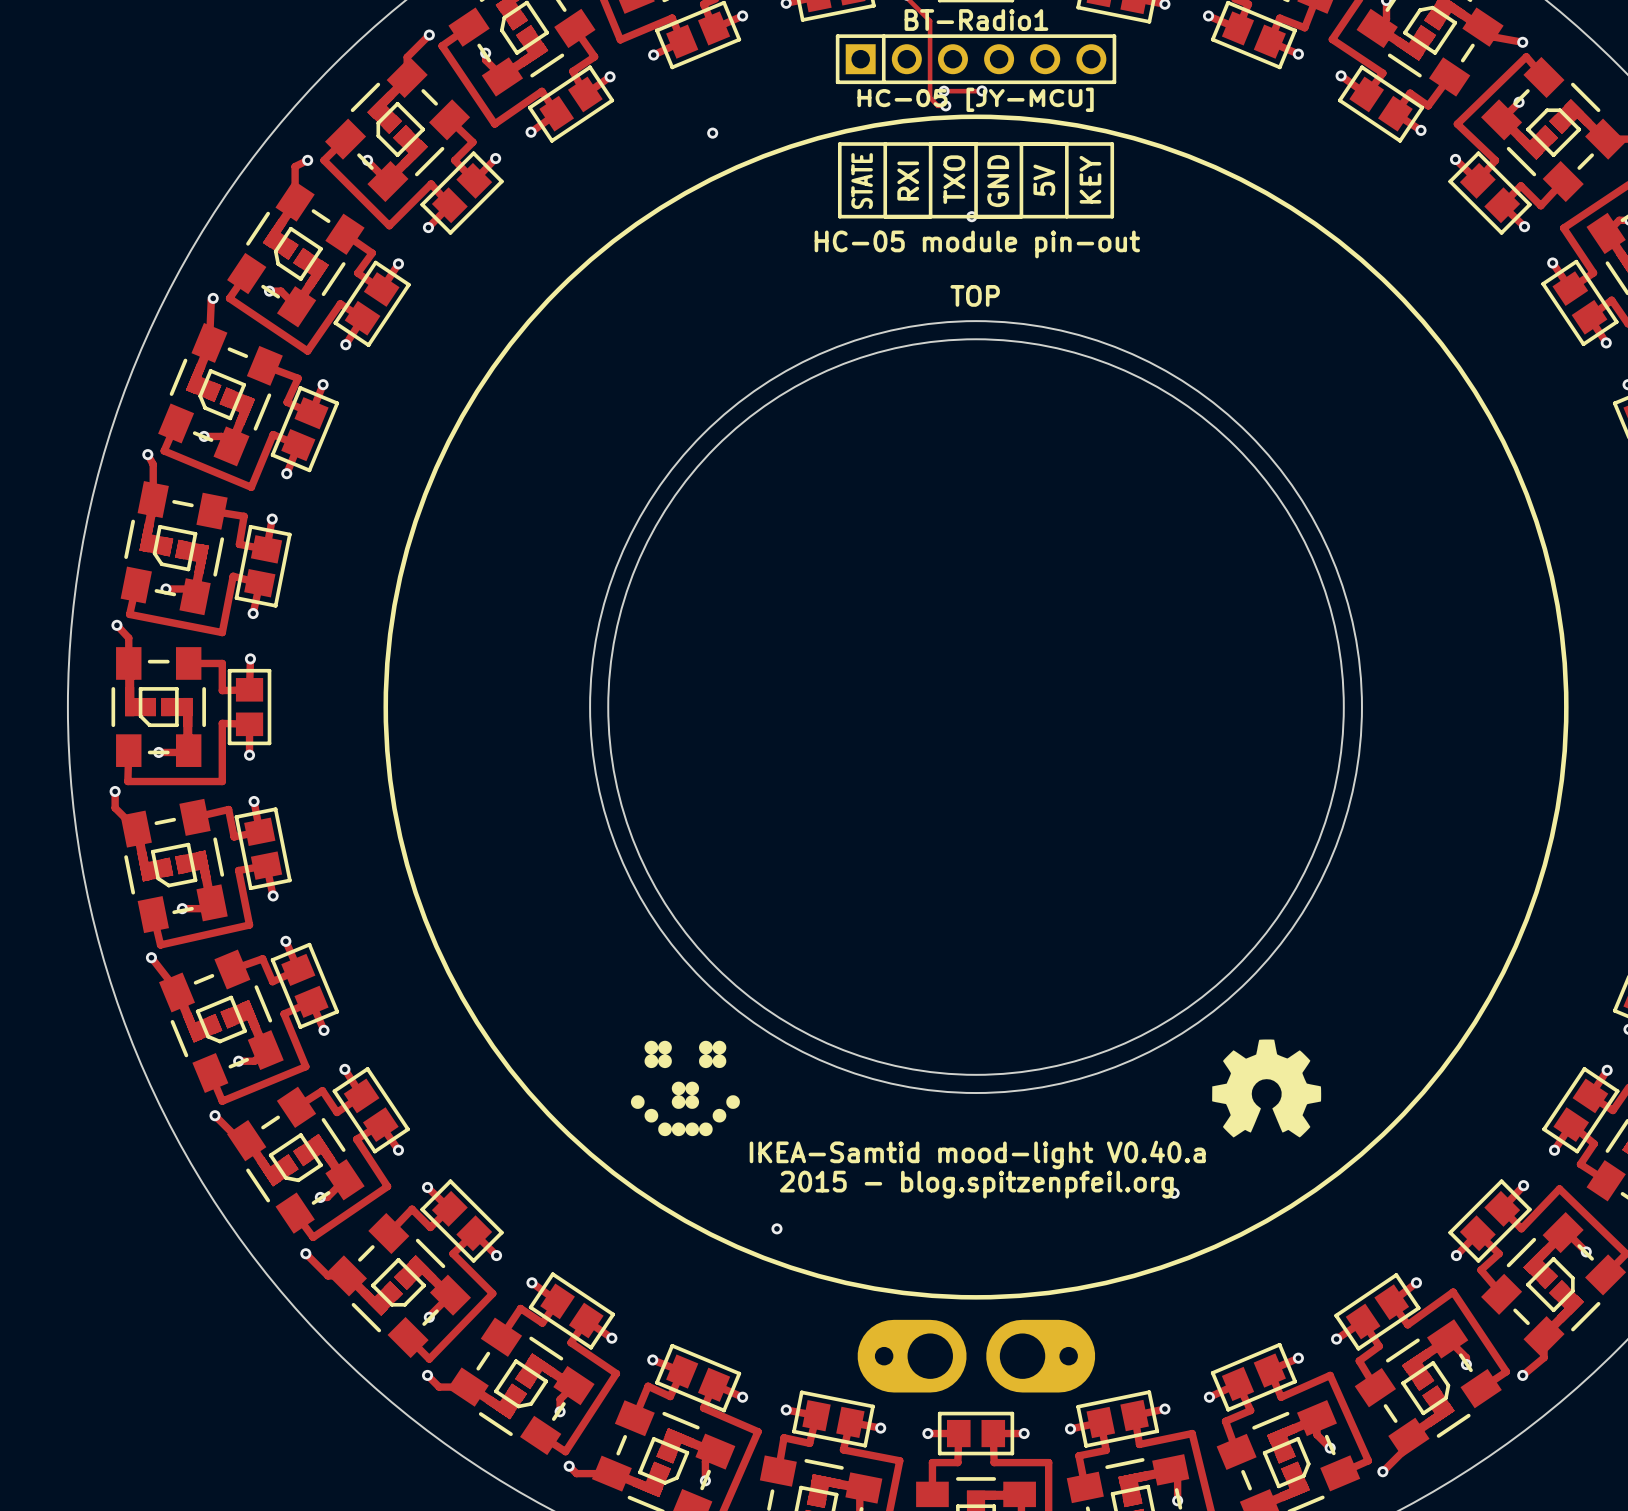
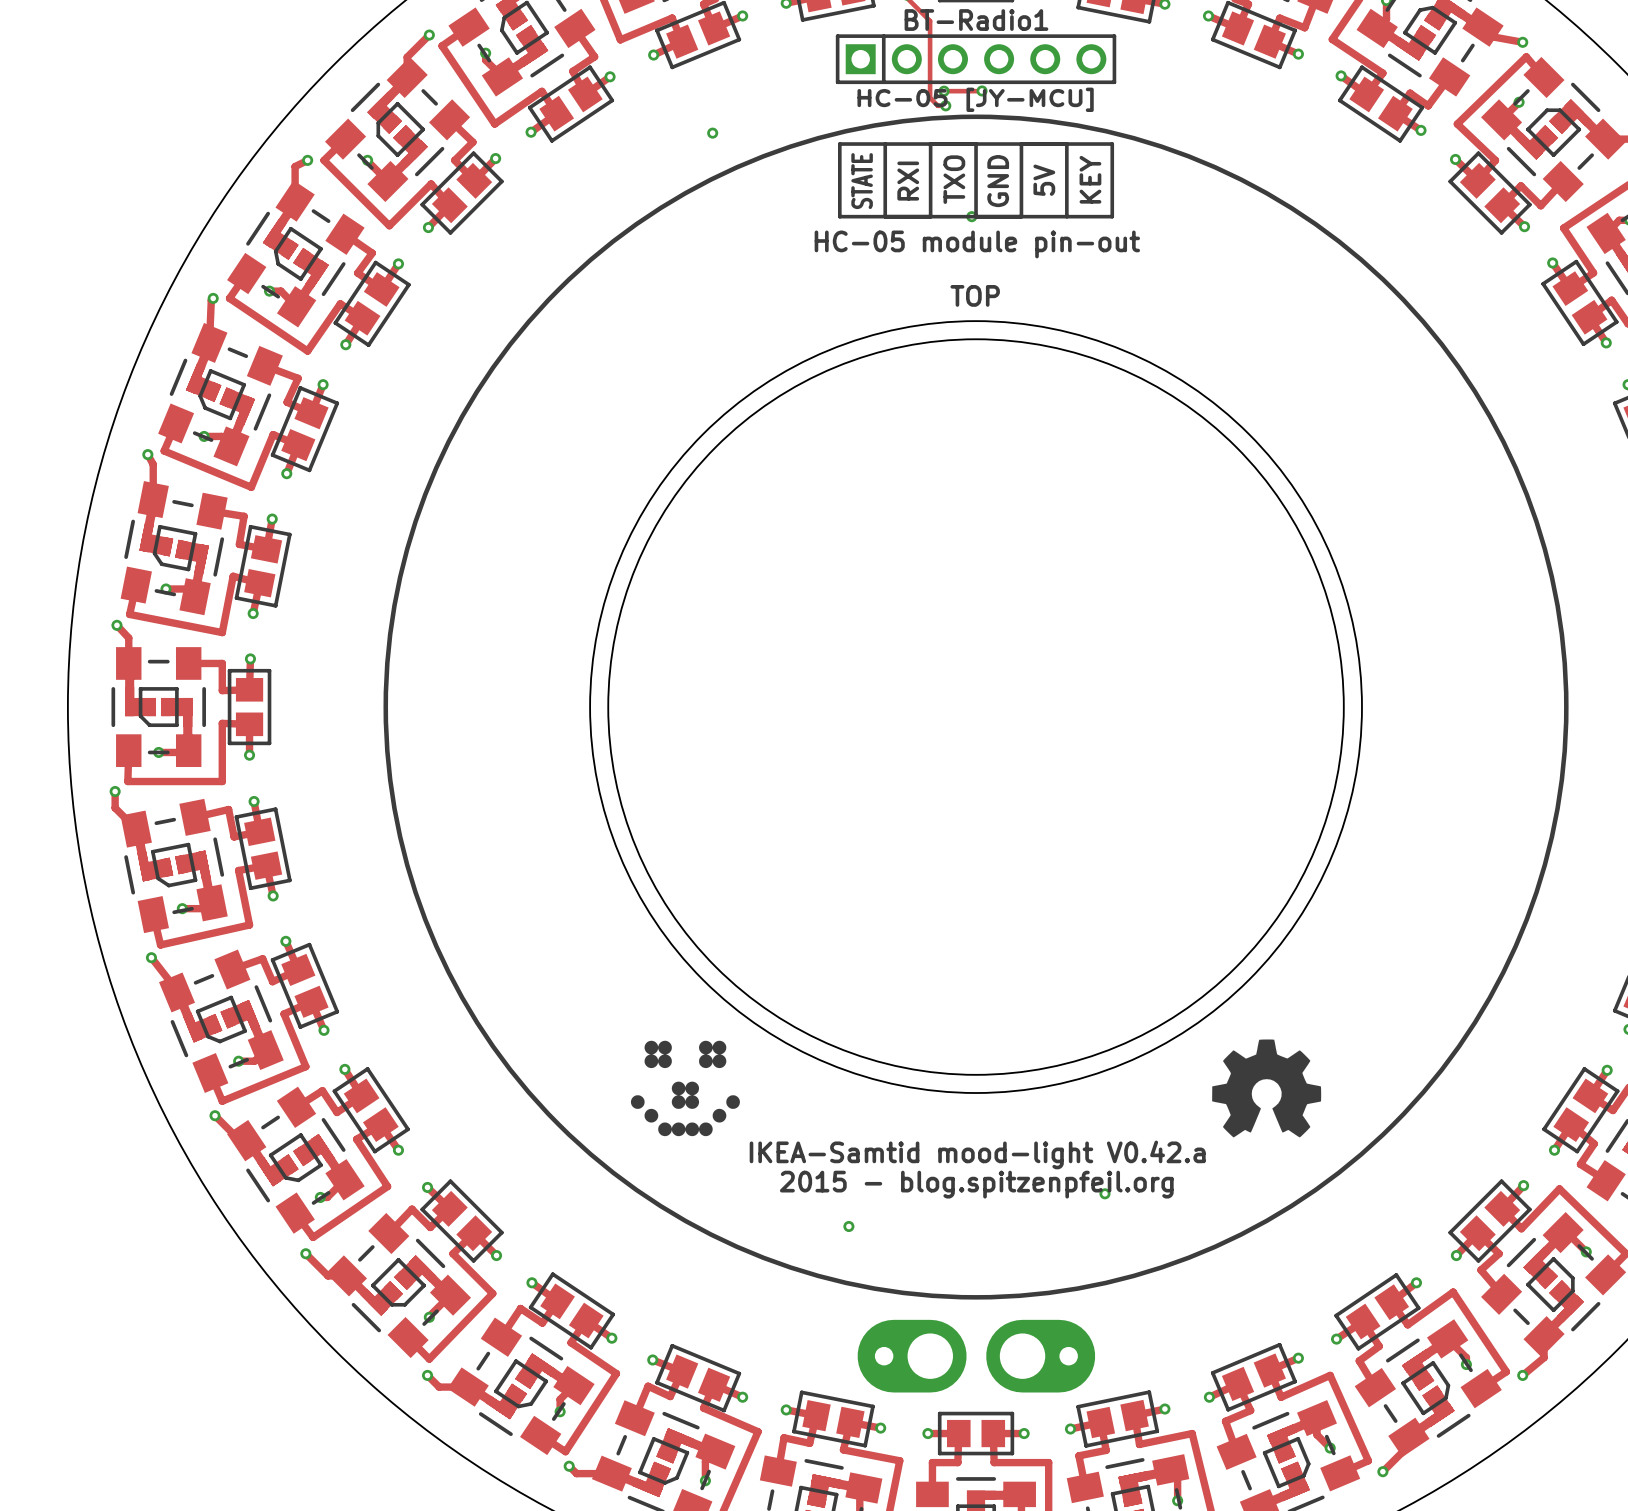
text: IKEA-Samtid mood-light V0.40.a (977, 1154) -> IKEA-Samtid mood-light V0.42.a (977, 1154)
via position: (1174, 1193) -> (1104, 1193)
via position: (776, 1228) -> (848, 1226)

